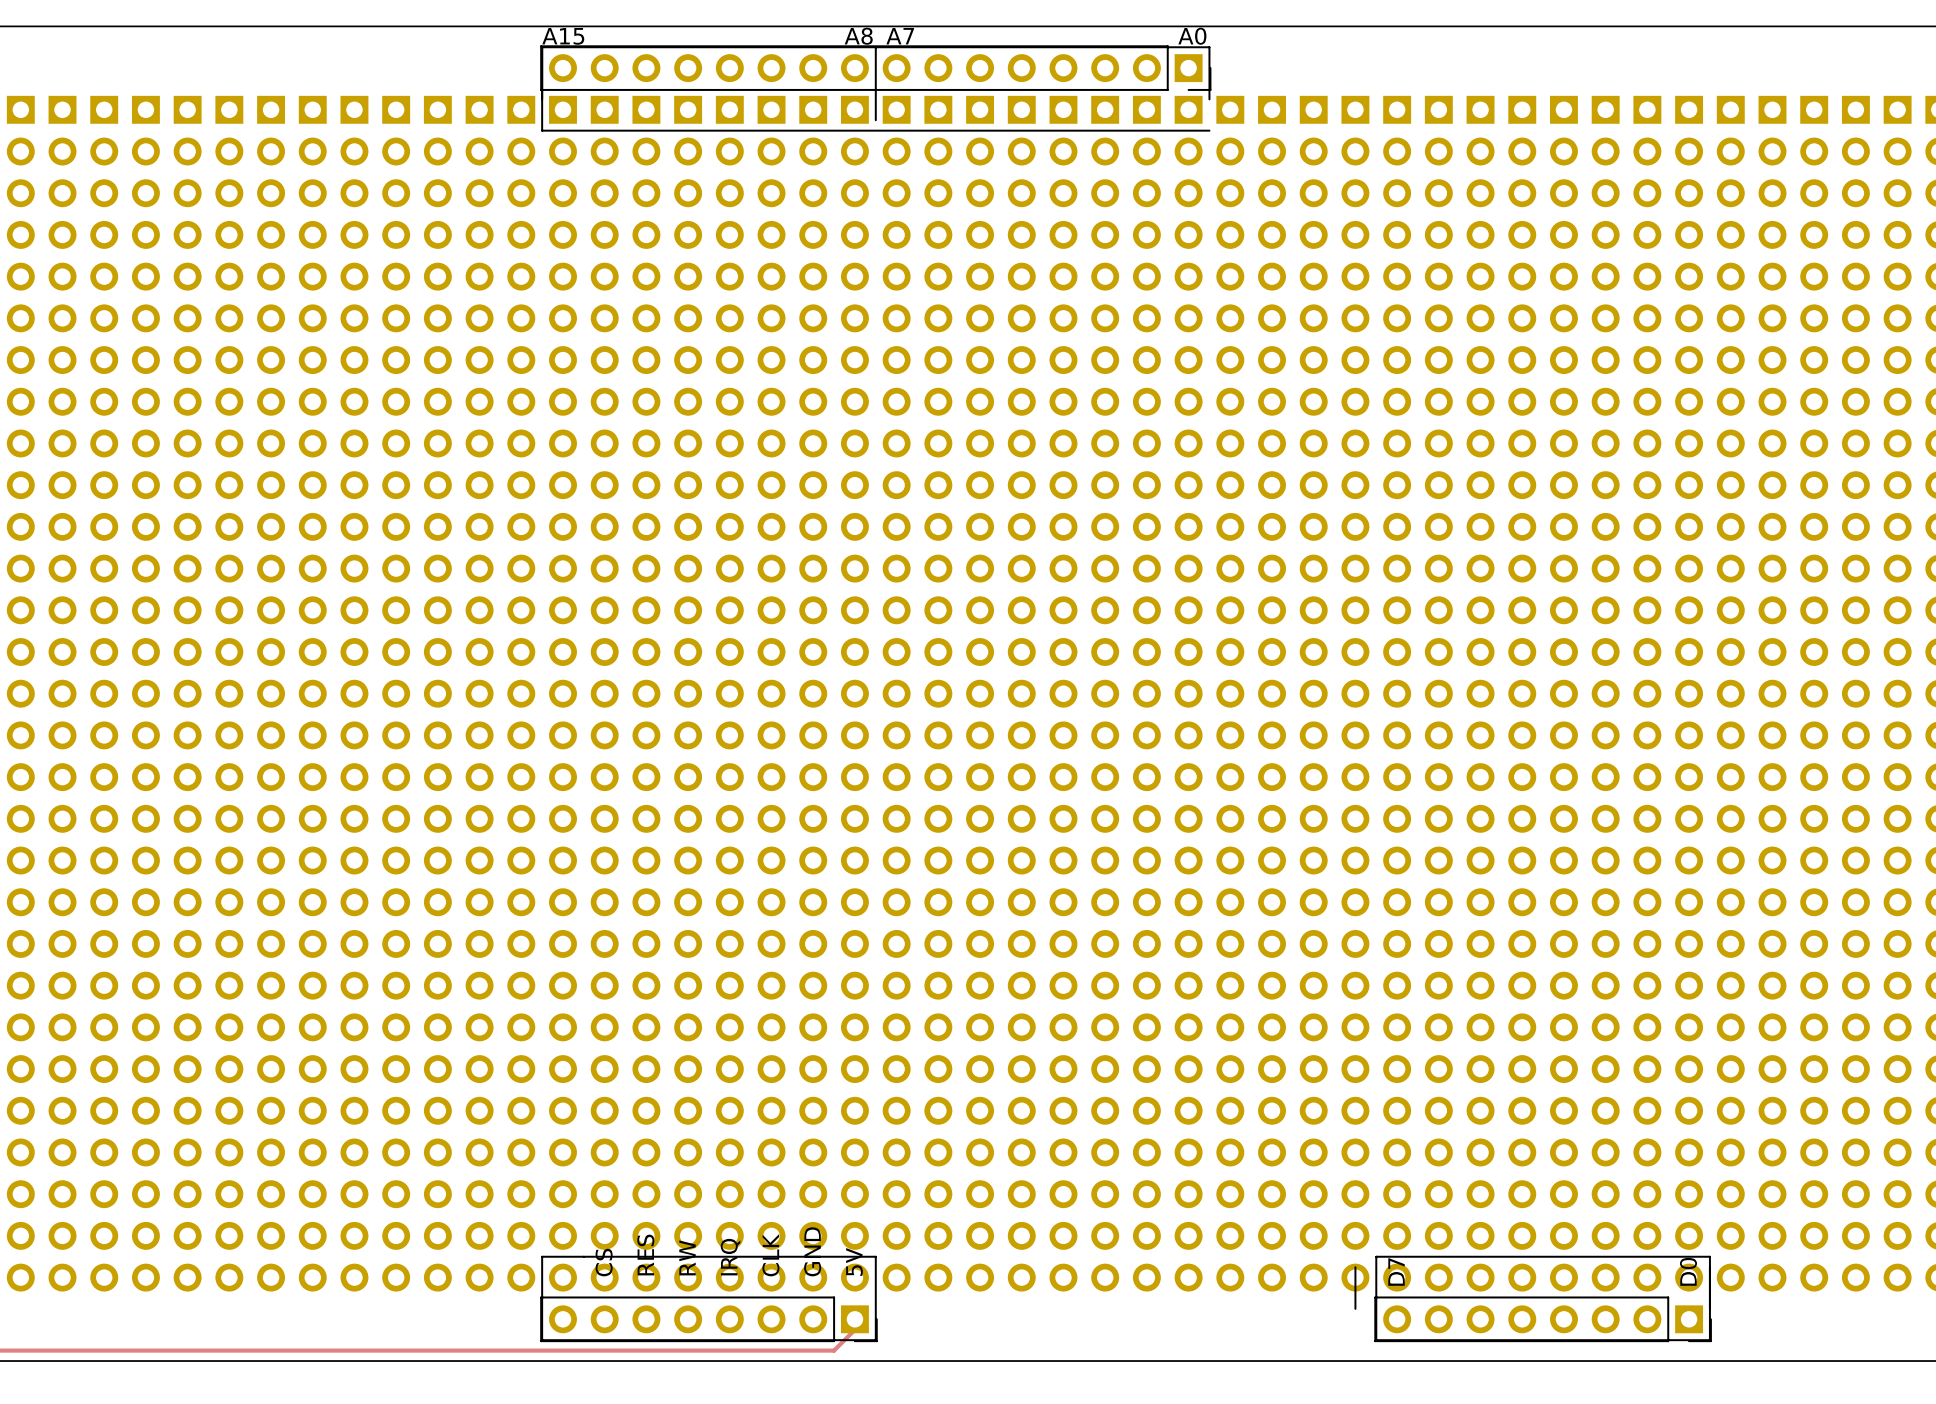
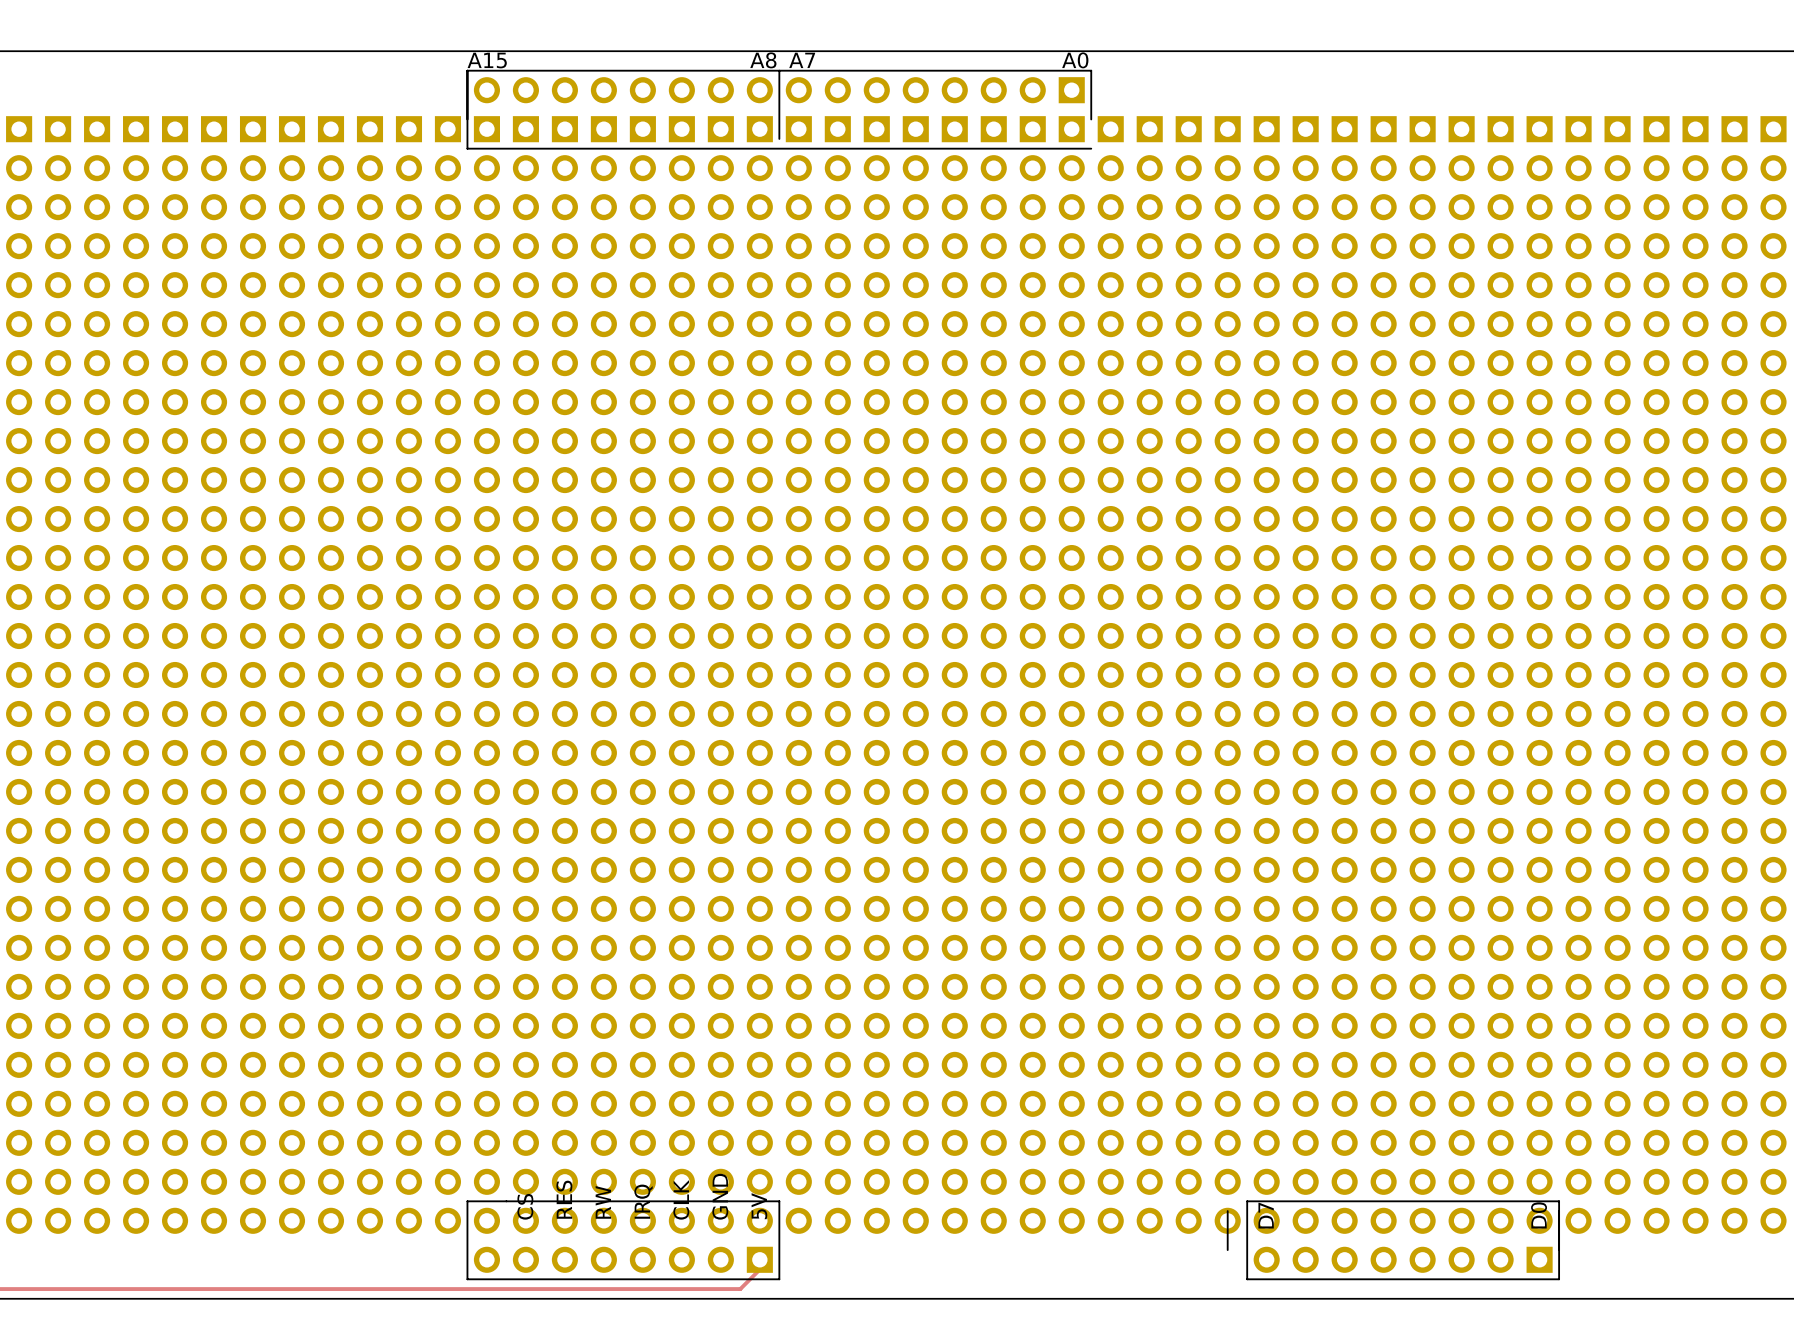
part side: top (875, 68) -> bottom (779, 90)
part side: top (708, 1319) -> bottom (623, 1259)
part side: top (1543, 1319) -> bottom (1403, 1259)

